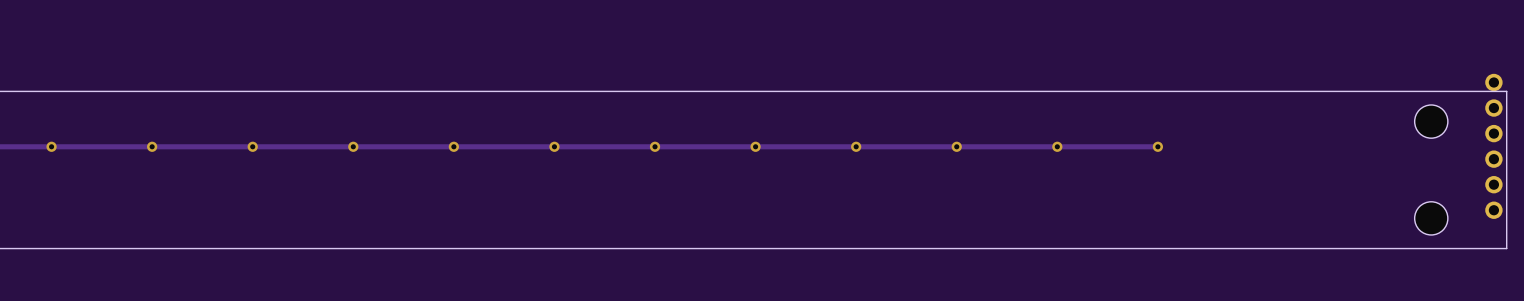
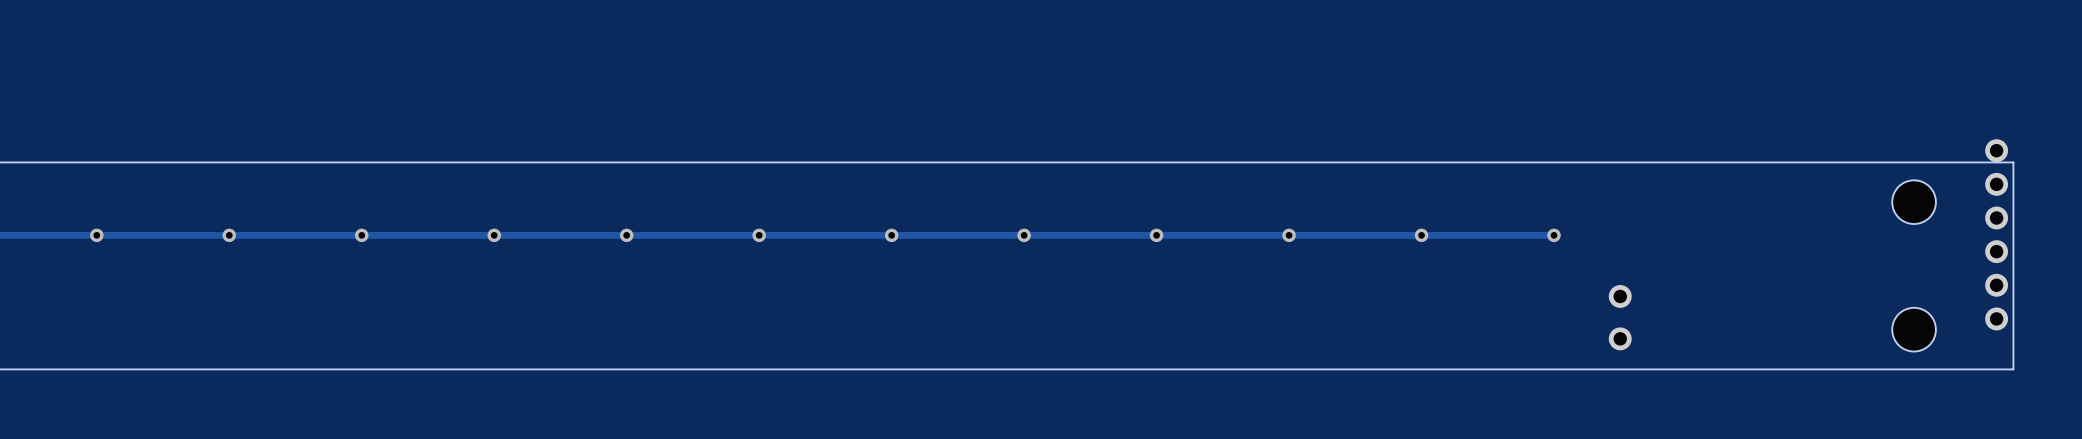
part: none -> (1620, 296)
part: none -> (1620, 338)

